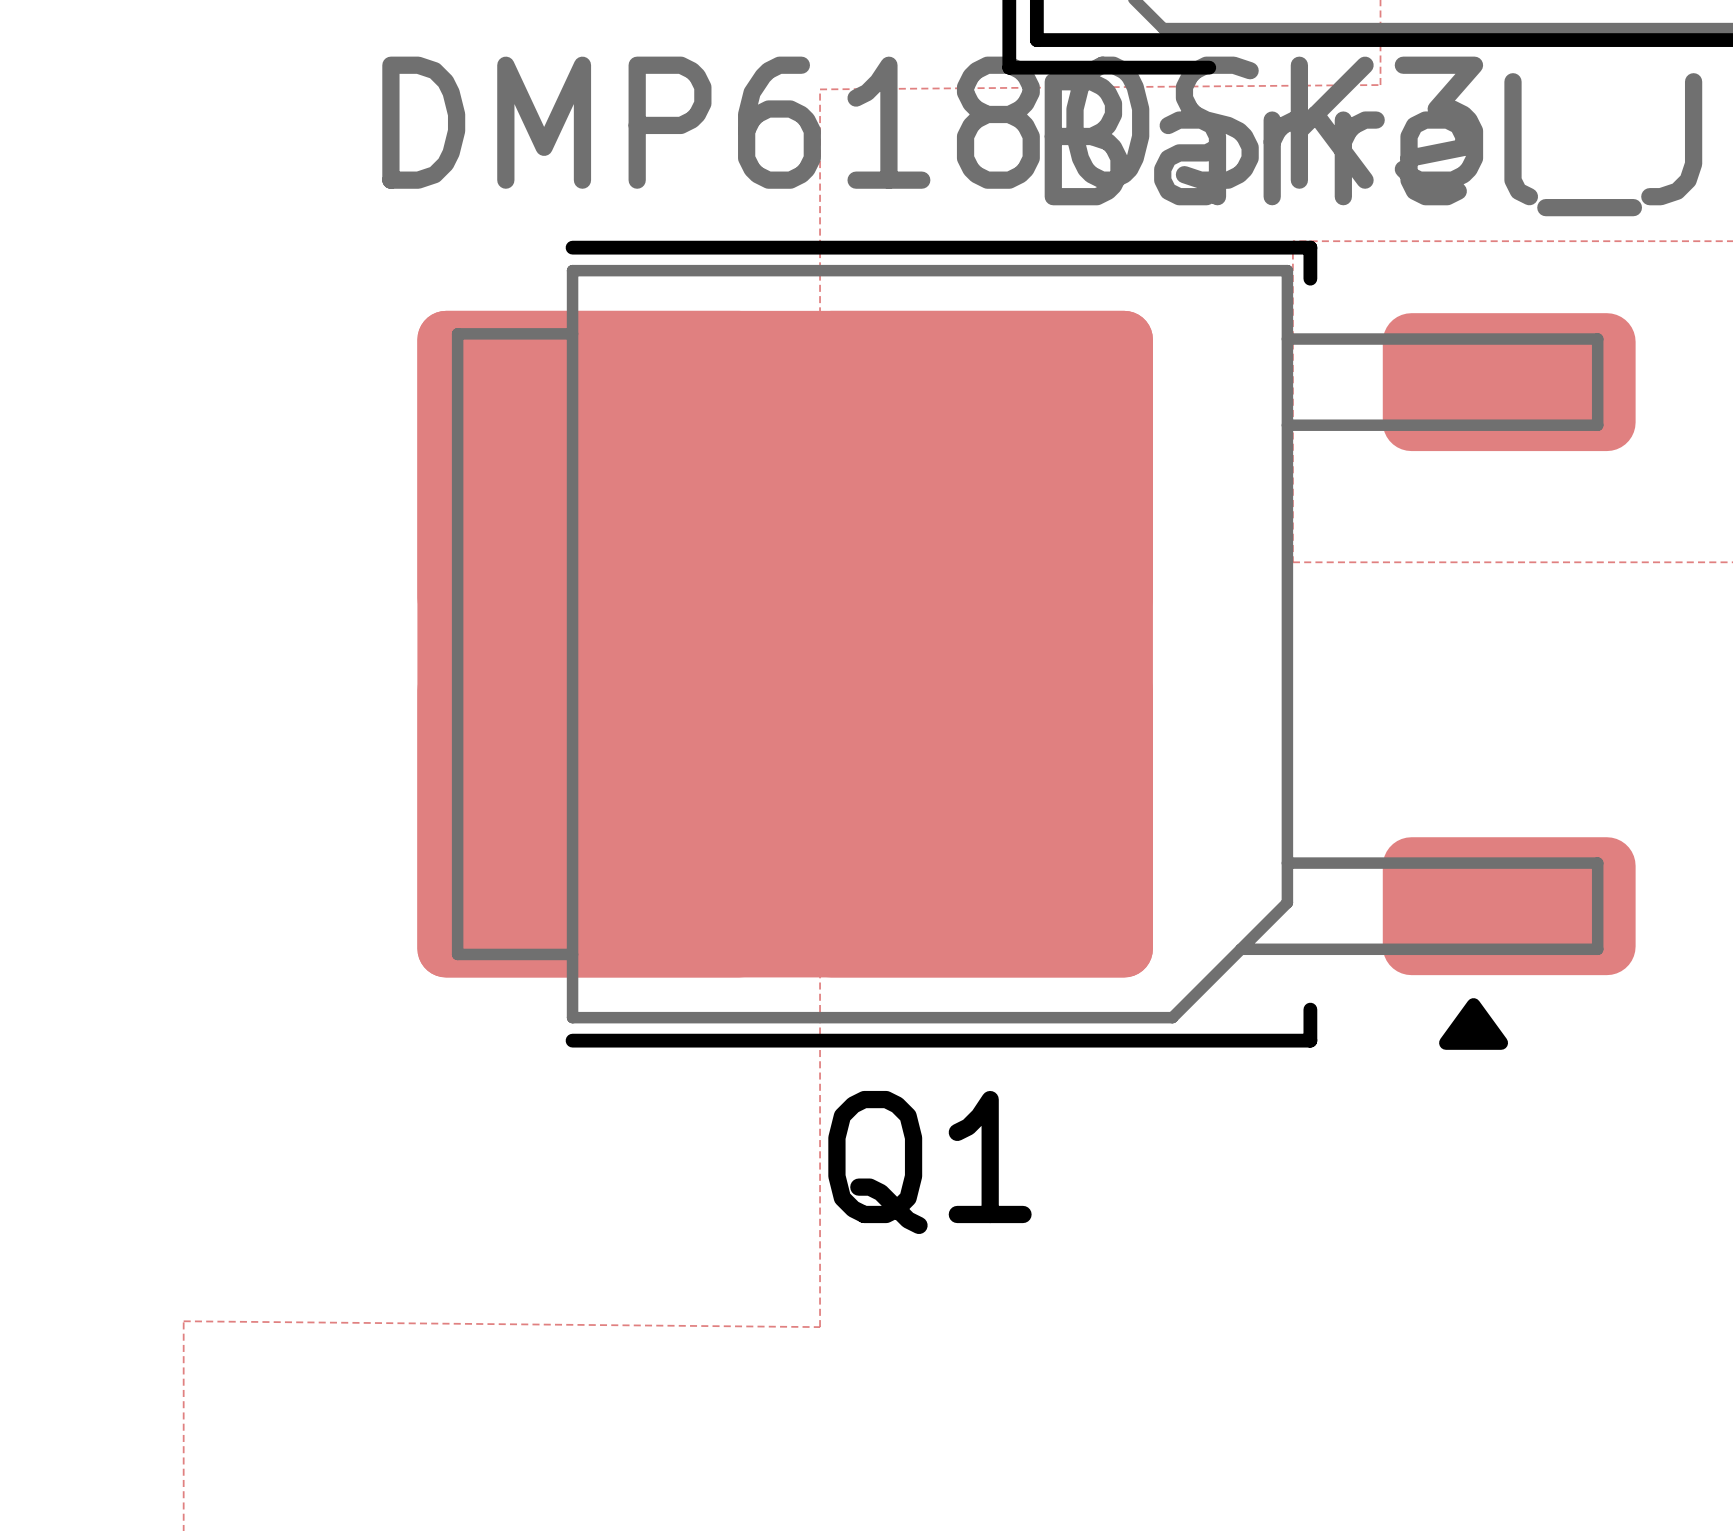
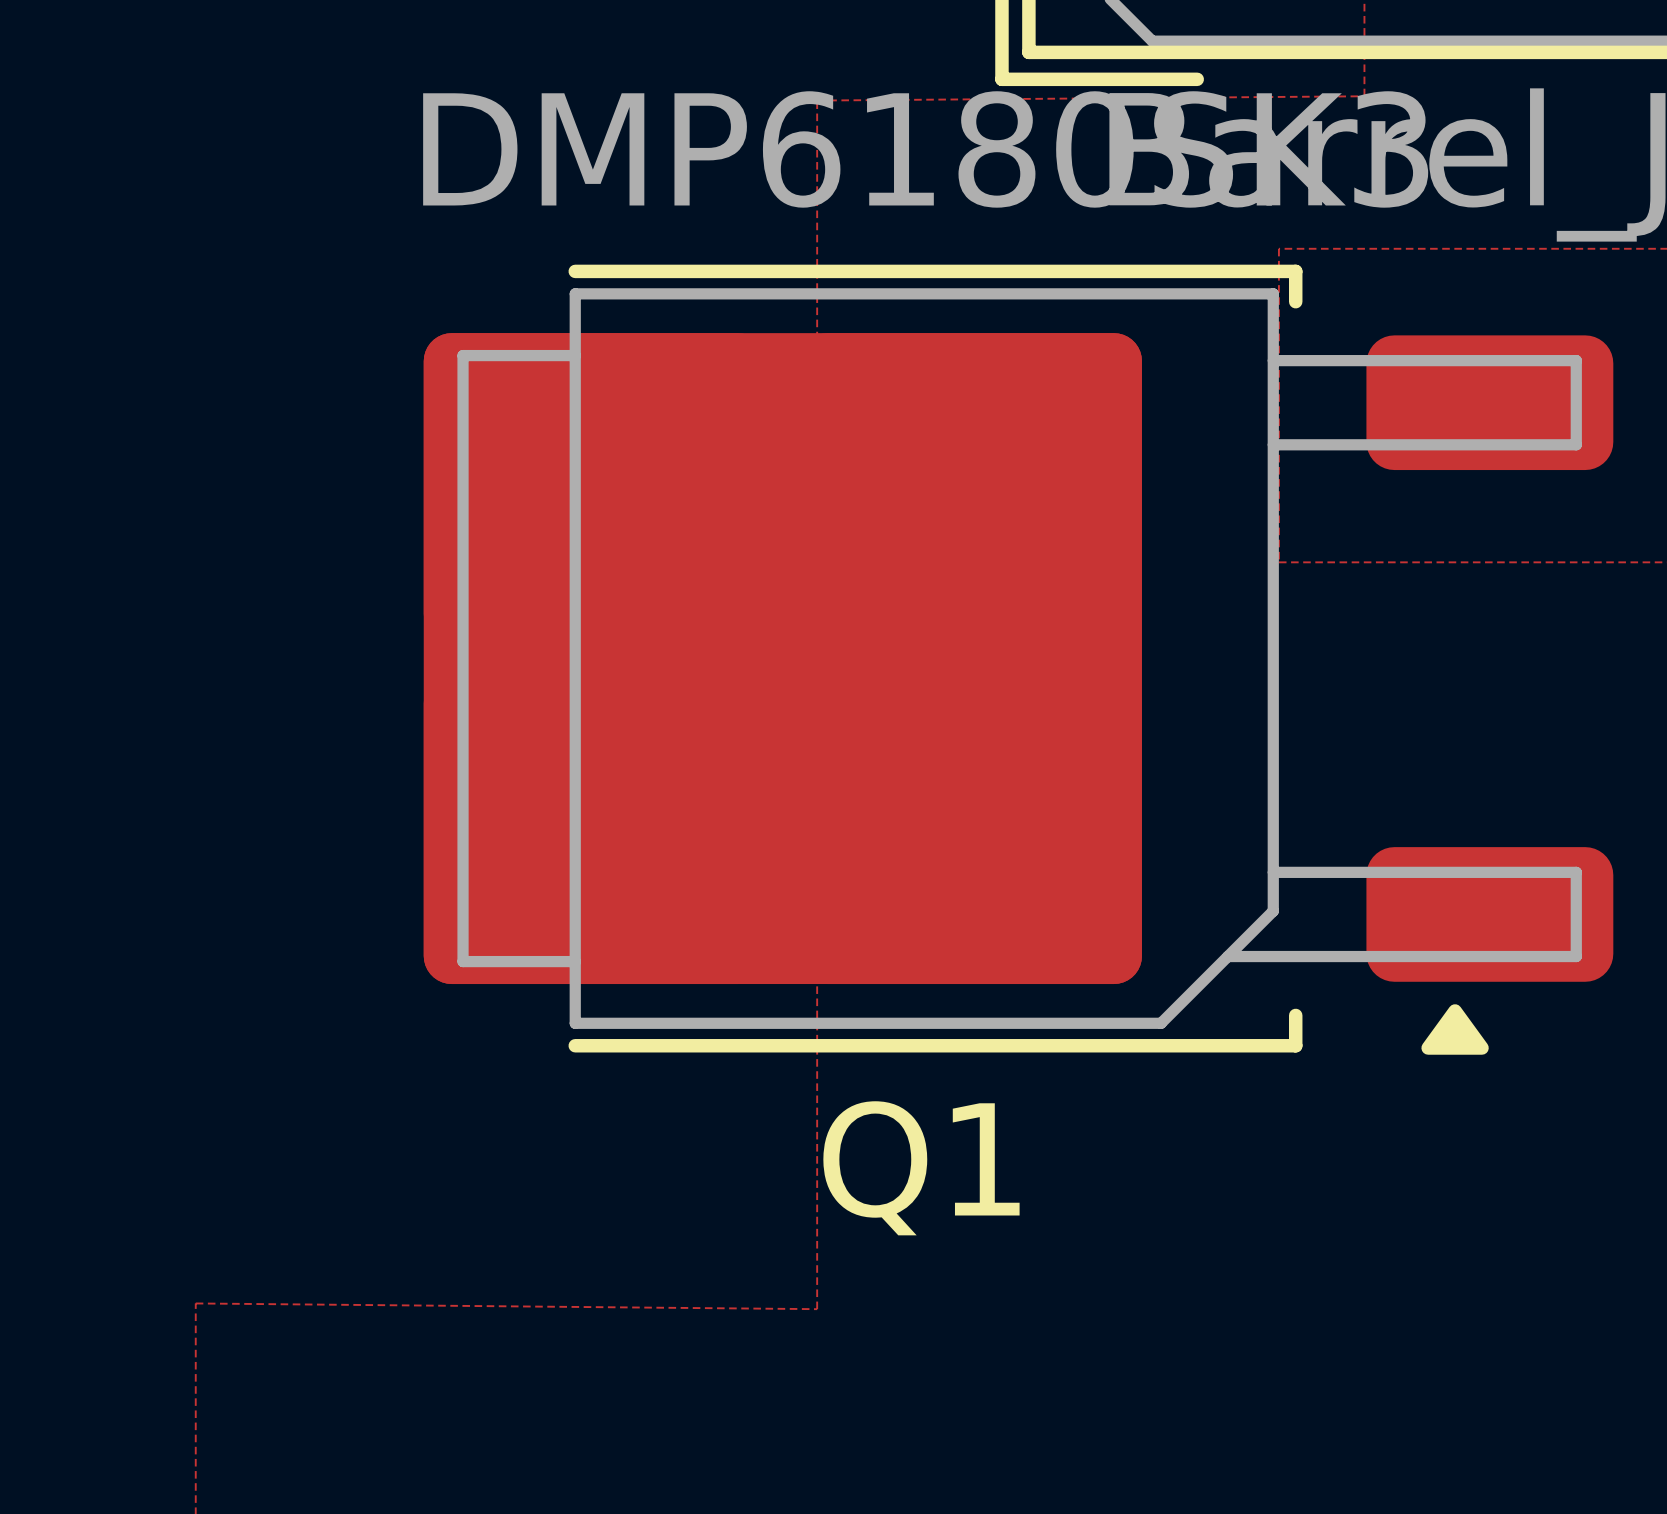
Q1 position: (1026, 645) -> (1018, 659)

